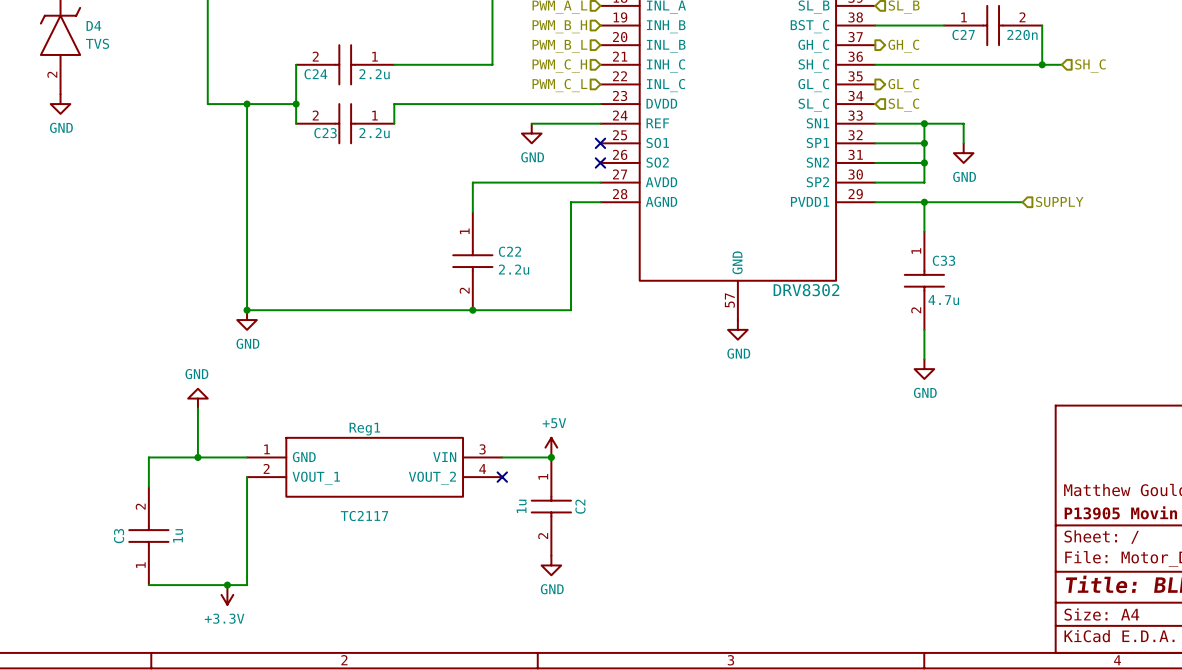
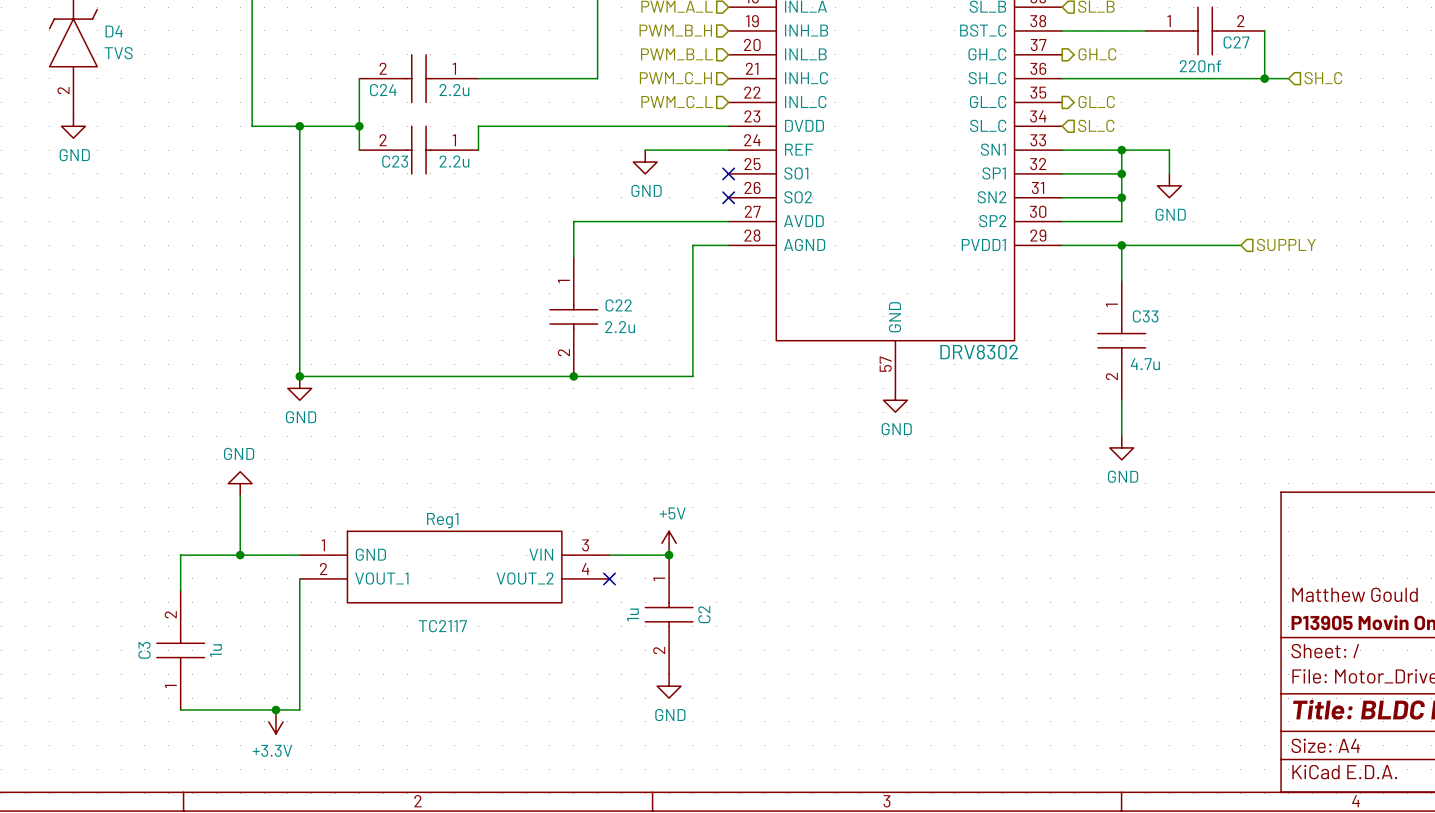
C27 name position: C27 (963, 34) -> C27 (1236, 42)
C27 value: 220n (1022, 34) -> 220nf (1200, 66)

